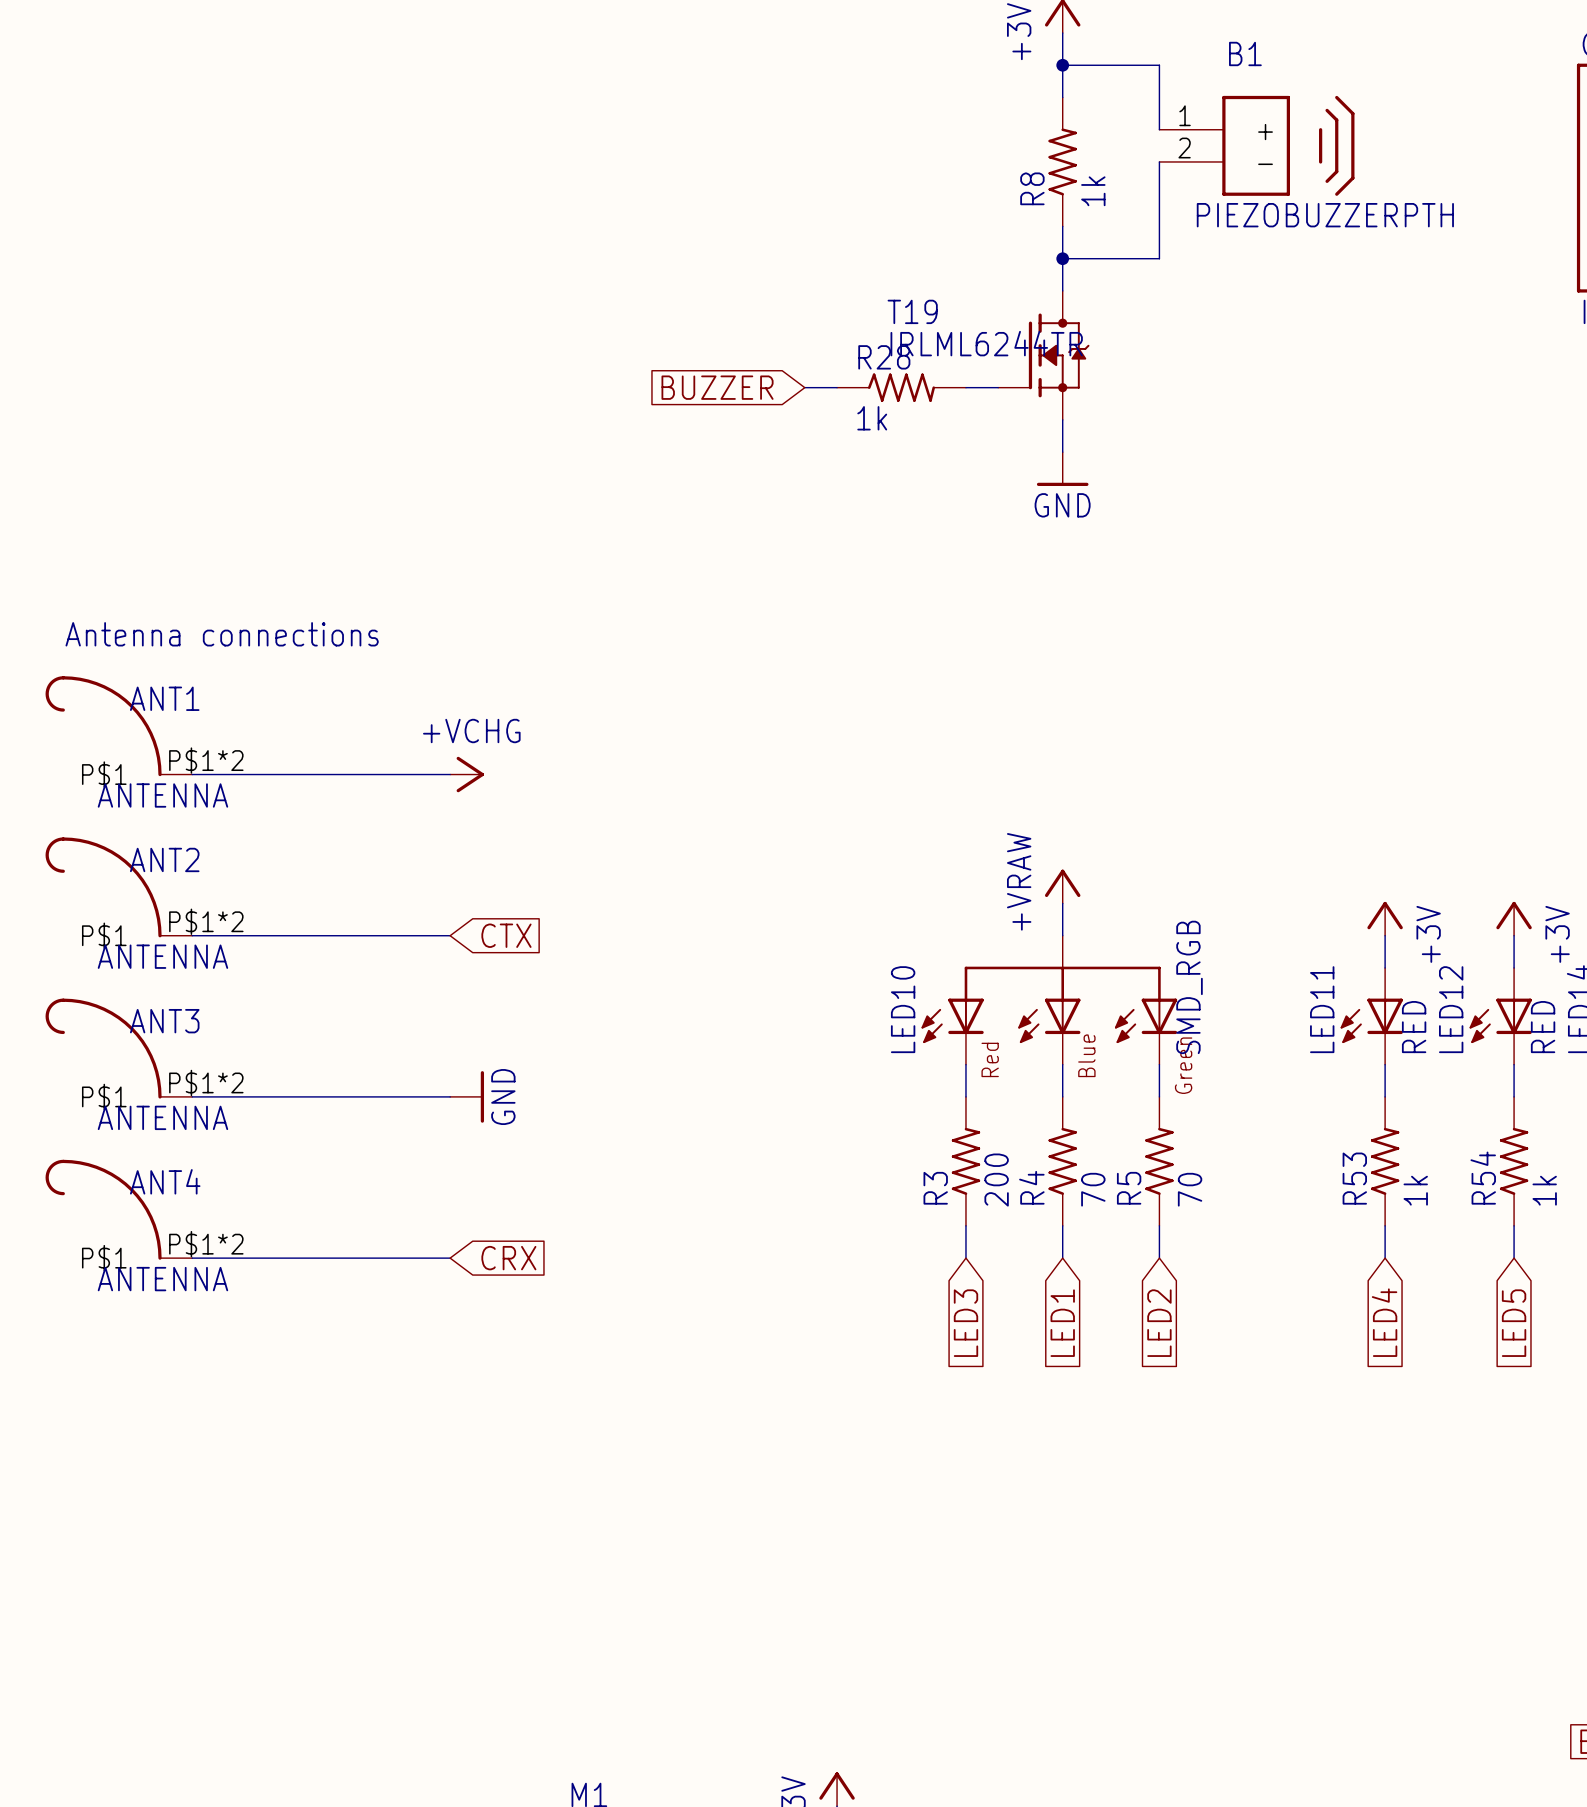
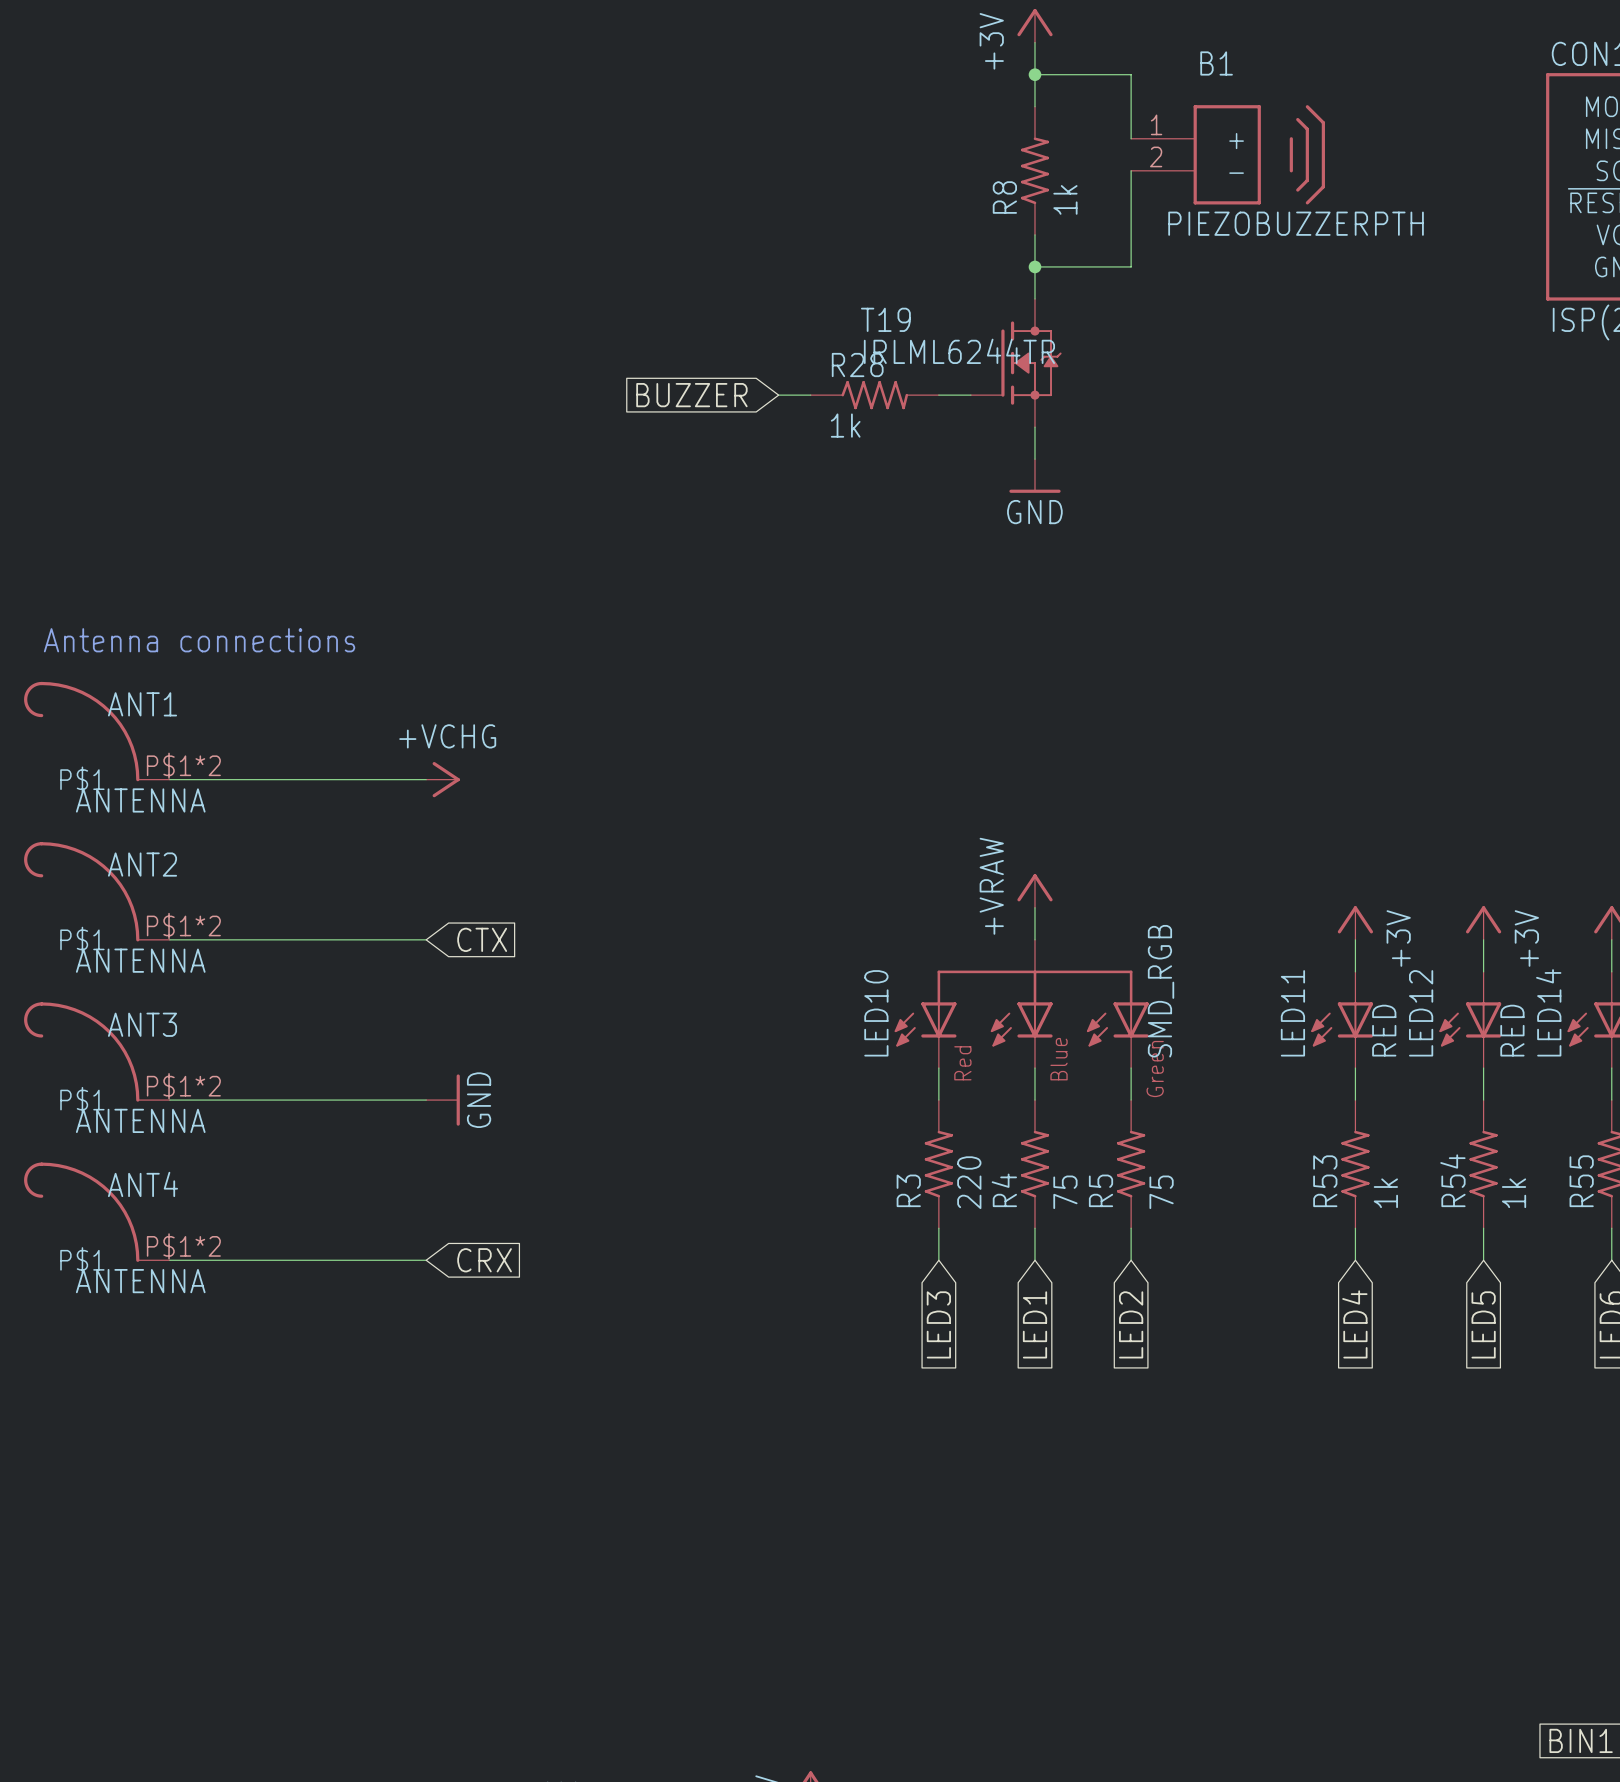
R3 value: 200 (996, 1180) -> 220 (969, 1182)
R4 value: 70 (1093, 1189) -> 75 (1065, 1192)
R5 value: 70 (1190, 1189) -> 75 (1161, 1192)

